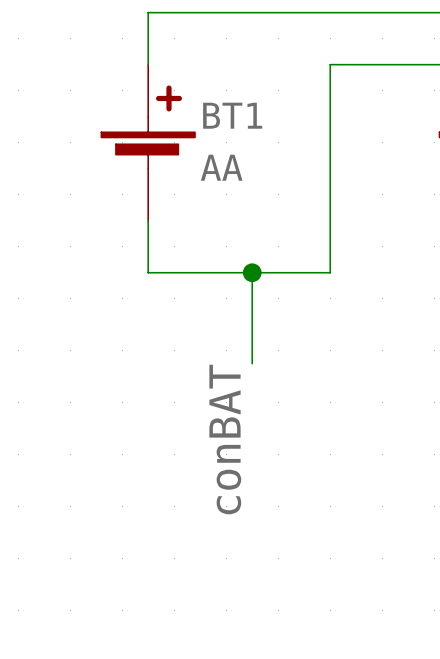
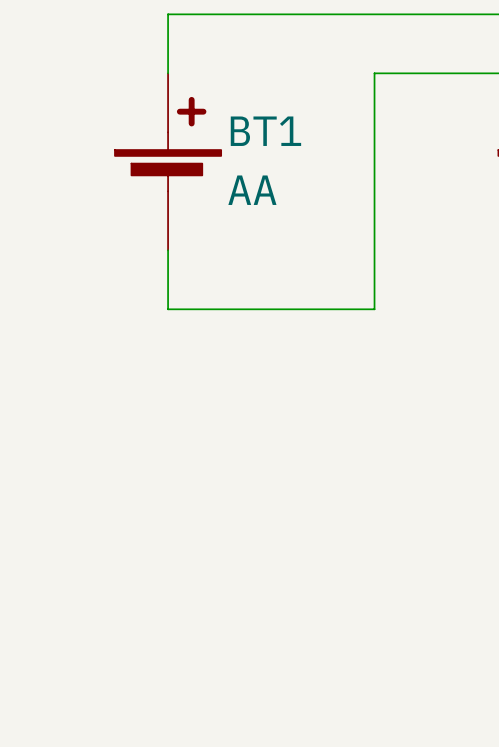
wire: (252, 272) (252, 363) -> none
junction: (252, 272) -> none
label: conBAT (225, 439) -> none

